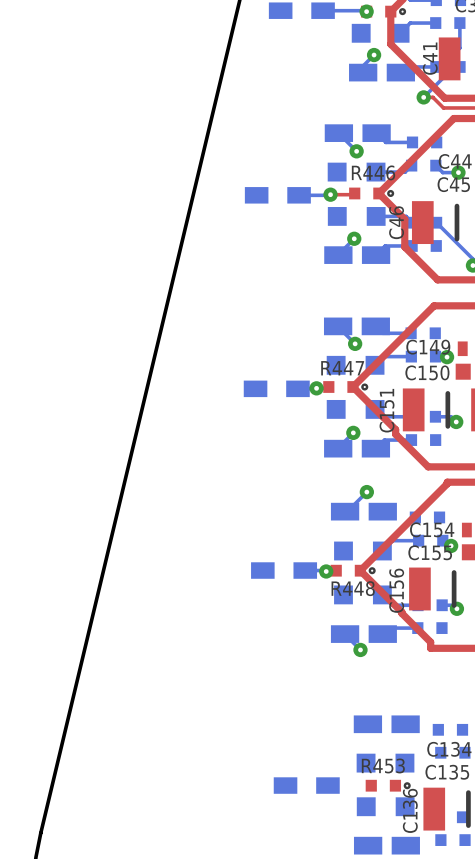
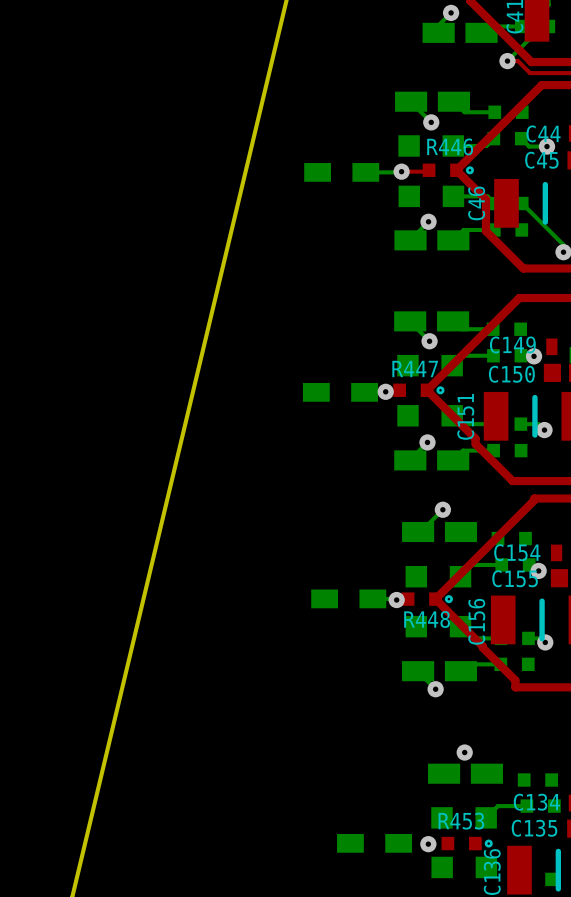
via: none -> (464, 752)
bottom track: none -> (526, 806) (497, 806) (486, 817)
via: none -> (428, 844)

